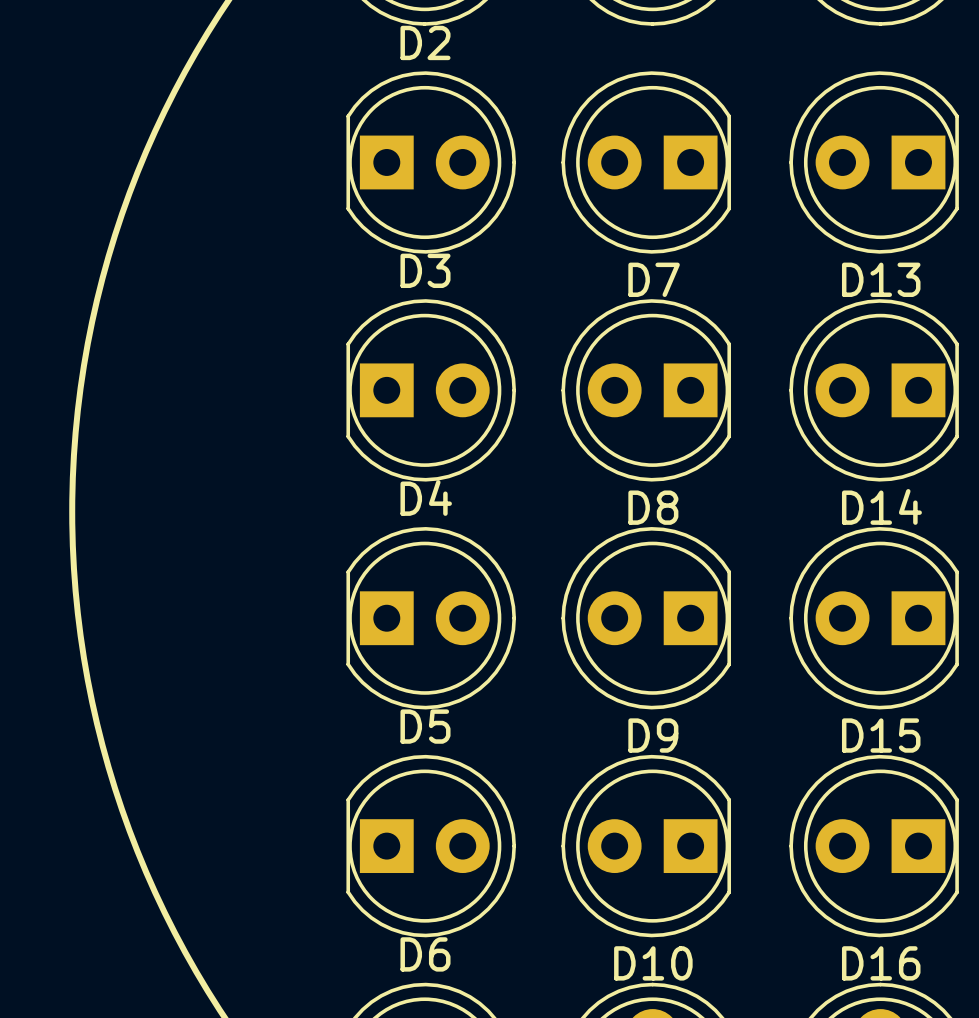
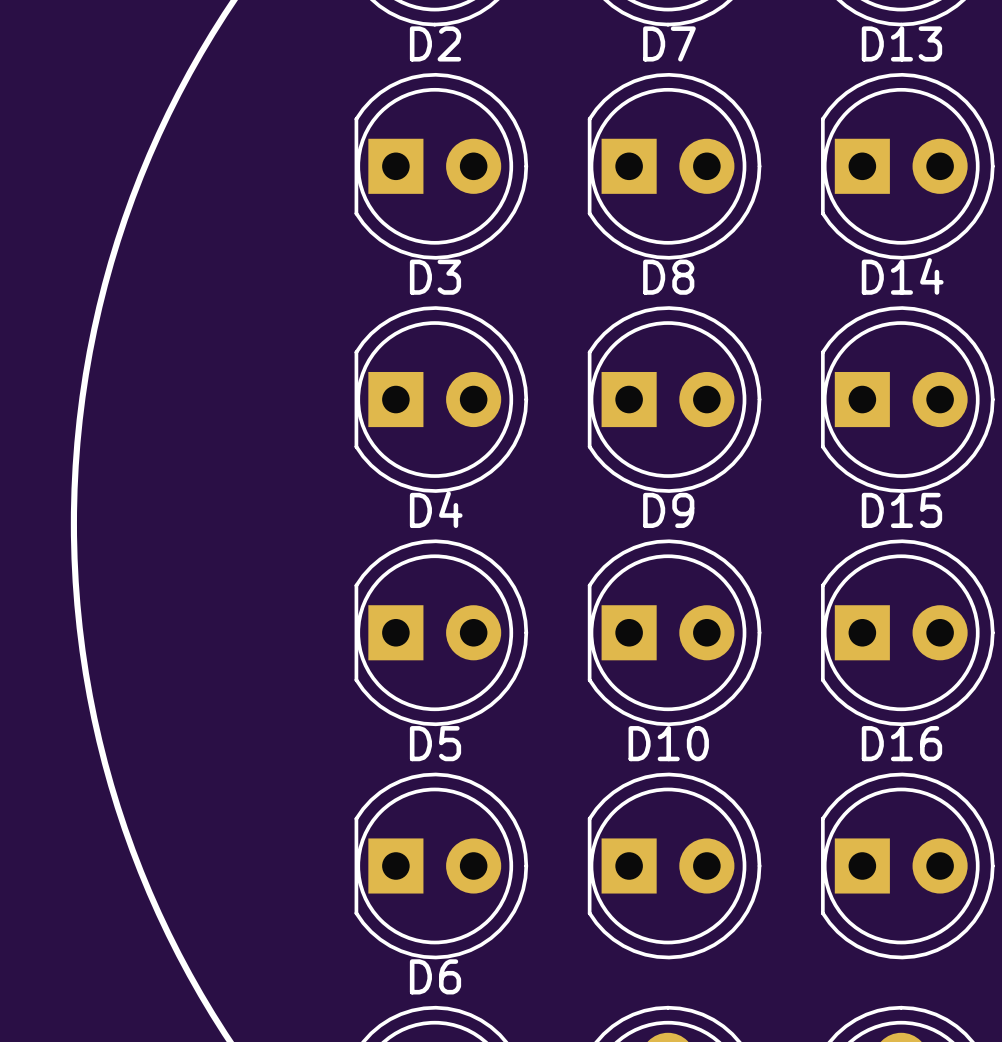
D7 rotation: 0° (646, 162) -> 180° (674, 166)
D13 rotation: 0° (874, 162) -> 180° (907, 166)
D8 rotation: 0° (646, 390) -> 180° (674, 399)
D14 rotation: 0° (874, 390) -> 180° (907, 399)
D9 rotation: 0° (646, 618) -> 180° (674, 632)
D15 rotation: 0° (874, 618) -> 180° (907, 632)
D10 rotation: 0° (646, 846) -> 180° (674, 865)
D16 rotation: 0° (874, 846) -> 180° (907, 865)

